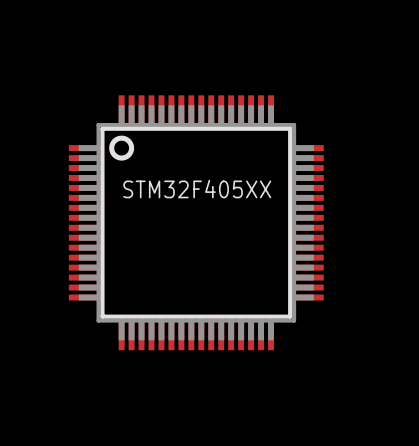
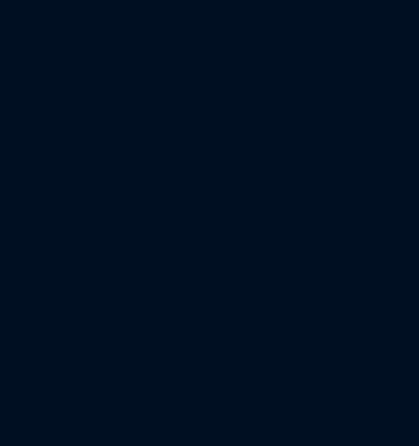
part: (196, 222) -> none

